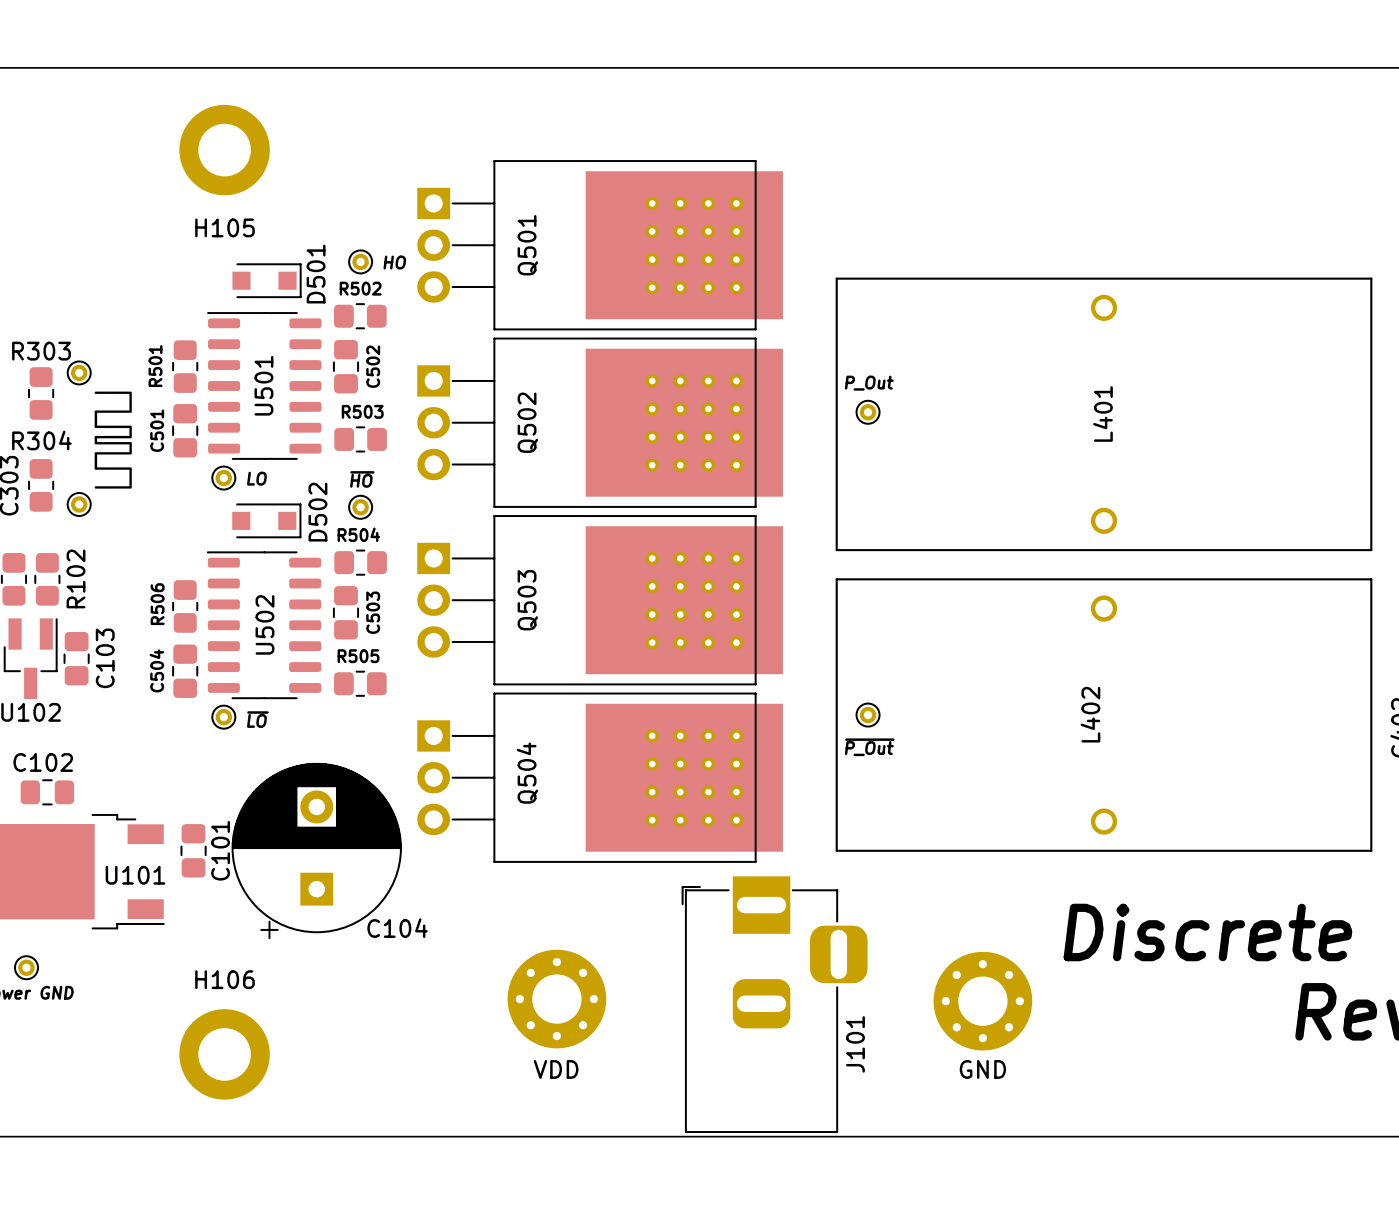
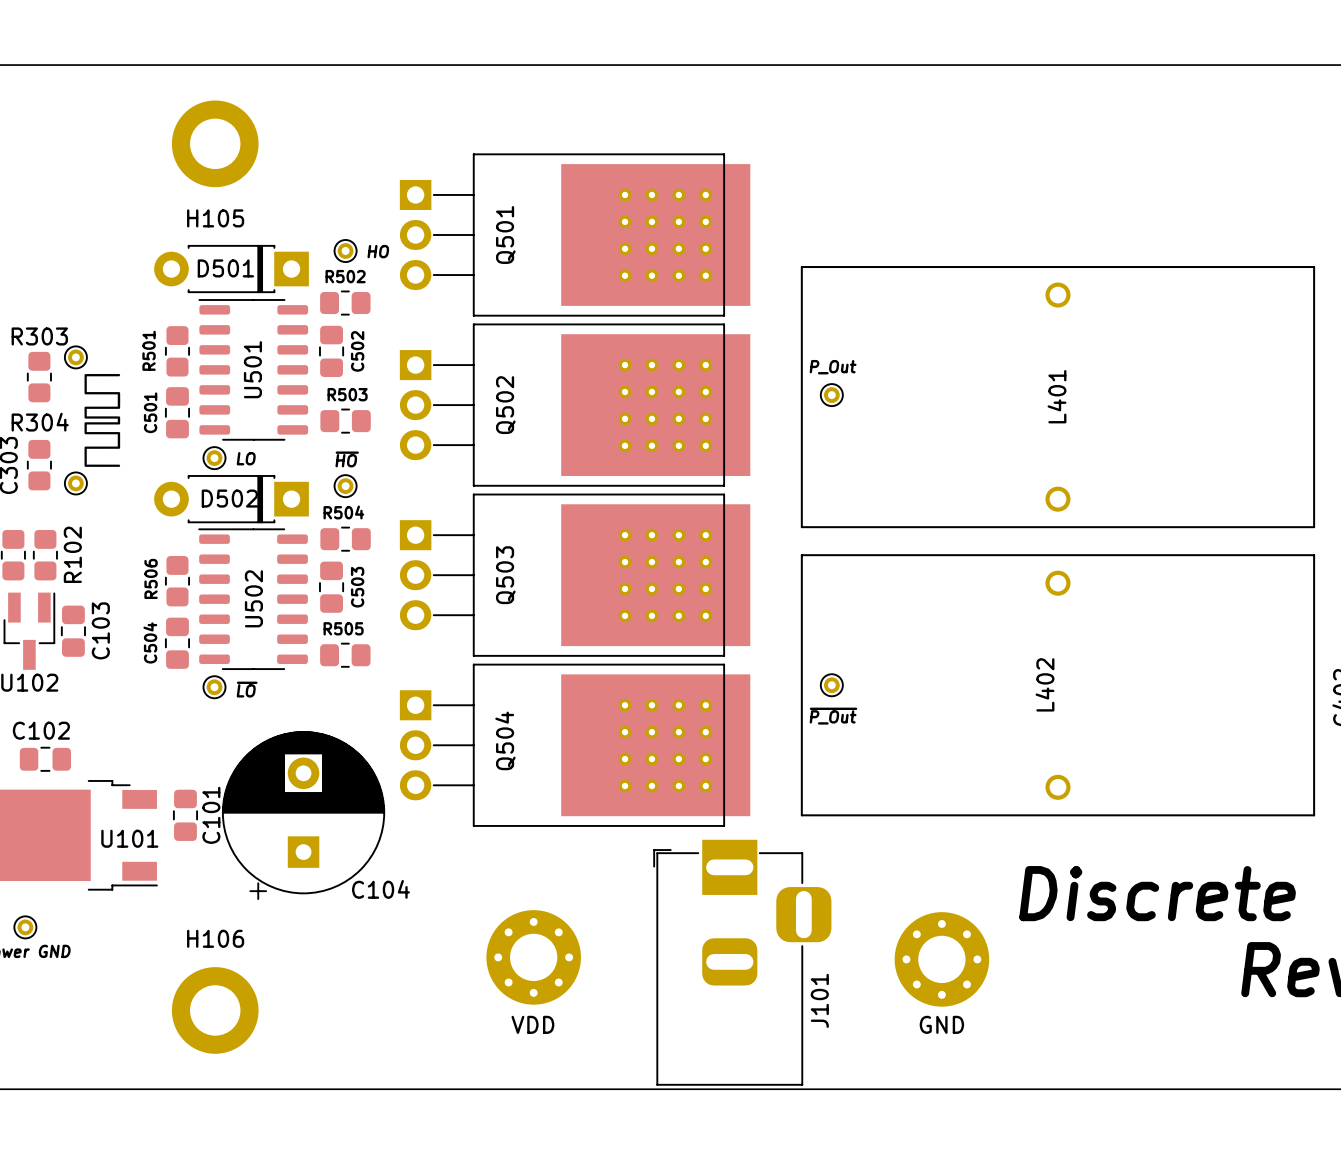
D501 footprint: [232, 263, 302, 299] -> [154, 244, 309, 294]
D501 name position: D501 (316, 274) -> D501 (225, 268)
drawing shape: [94, 391, 132, 489] -> [84, 373, 121, 467]
D502 footprint: [232, 503, 302, 539] -> [154, 475, 309, 524]
D502 name position: D502 (317, 512) -> D502 (229, 498)

